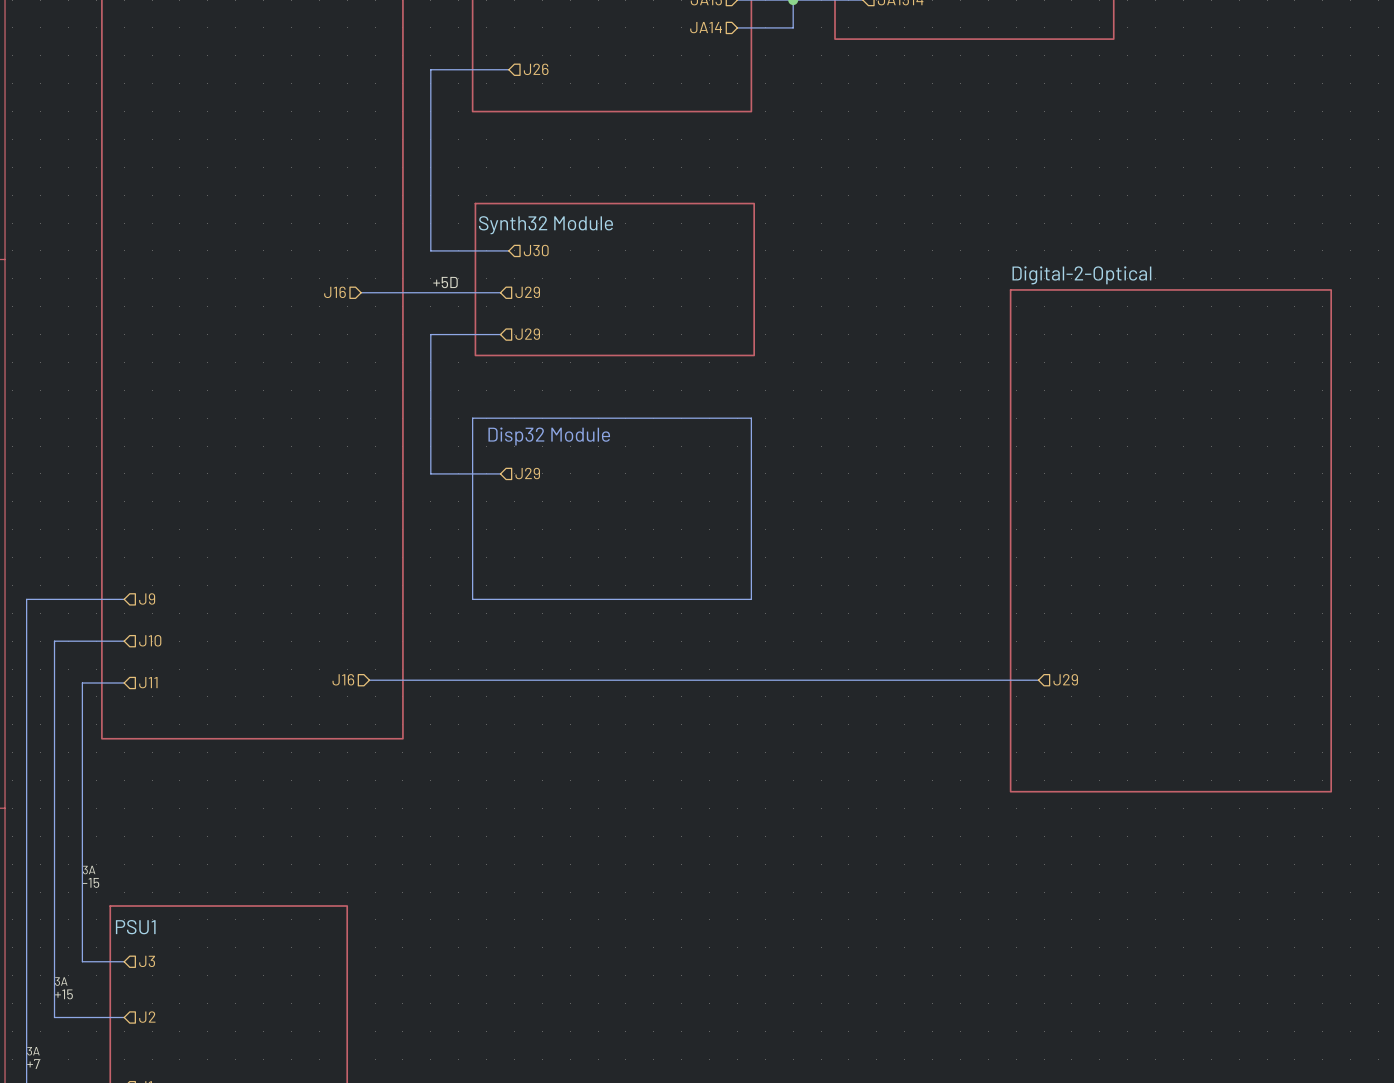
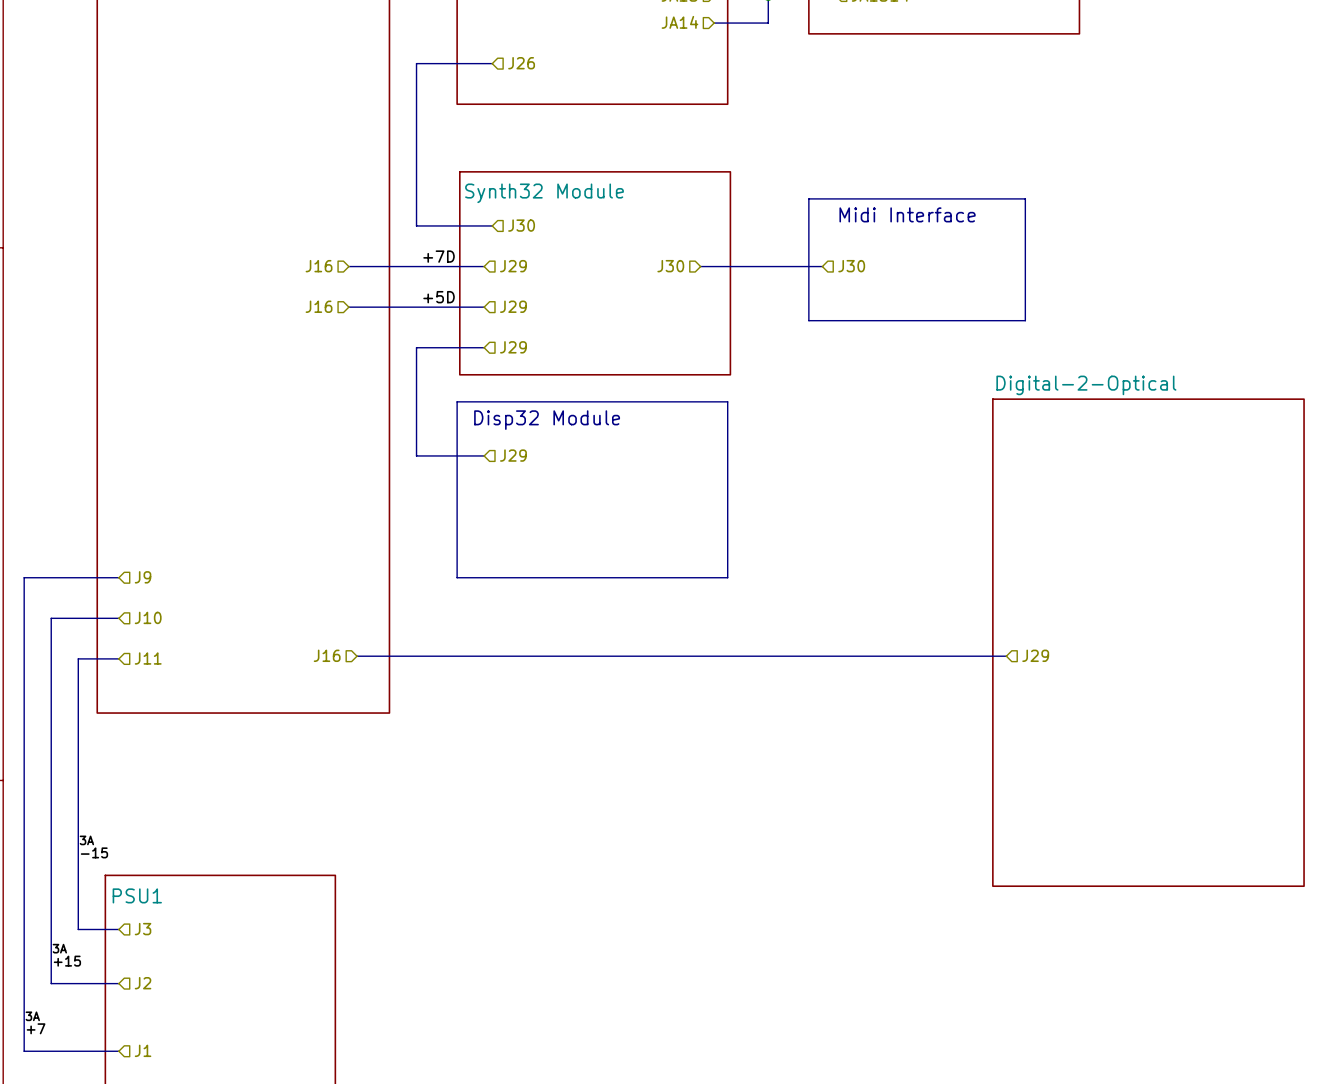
sheet Synth32 Module shape: [474, 202, 756, 357] -> [459, 171, 732, 376]
line: none -> (808, 198) (1025, 198) (1025, 320) (808, 320) (808, 198)
sheet Synth32 Module name position: Synth32 Module (545, 225) -> Synth32 Module (544, 193)
text: none -> Midi Interface (907, 214)
bus: (430, 237) (430, 250) (508, 250) -> (416, 225) (492, 225)
hierarchical label position: J30 (536, 250) -> J30 (521, 225)
label: none -> +7D (439, 256)
hierarchical label: none -> J30 (670, 266)
bus: none -> (700, 266) (822, 266)
hierarchical label: none -> J30 (851, 266)
label position: +5D (445, 282) -> +5D (439, 297)
hierarchical label position: J16 (334, 292) -> J16 (319, 266)
bus: (361, 292) (500, 292) -> (348, 266) (484, 266)
hierarchical label position: J29 (527, 292) -> J29 (513, 266)
hierarchical label: none -> J16 (319, 306)
bus: none -> (348, 307) (484, 307)
bus: (500, 334) (430, 334) (430, 362) -> (484, 347) (416, 347)
hierarchical label position: J29 (527, 334) -> J29 (513, 306)
hierarchical label: none -> J29 (513, 347)
sheet Digital-2-Optical position: (1170, 540) -> (1148, 642)

